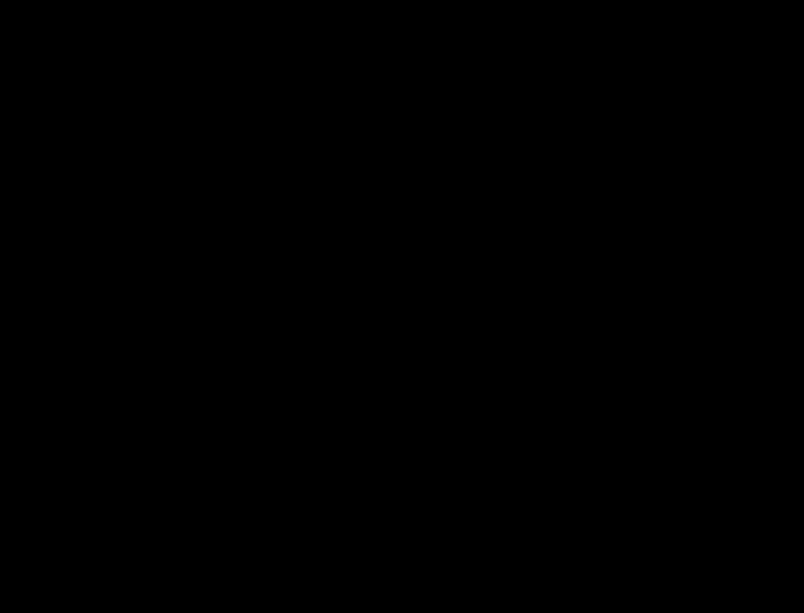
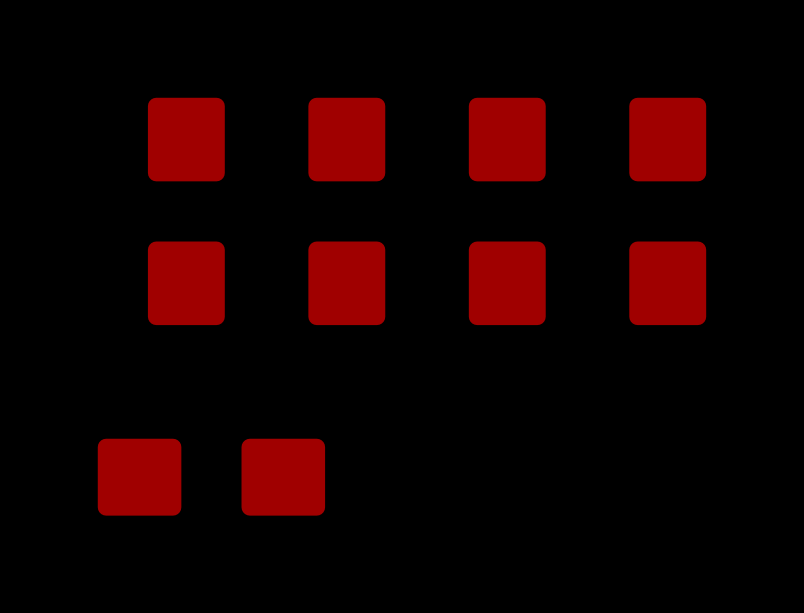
part: none -> (186, 211)
part: none -> (346, 211)
part: none -> (507, 211)
part: none -> (667, 211)
part: none -> (211, 477)

